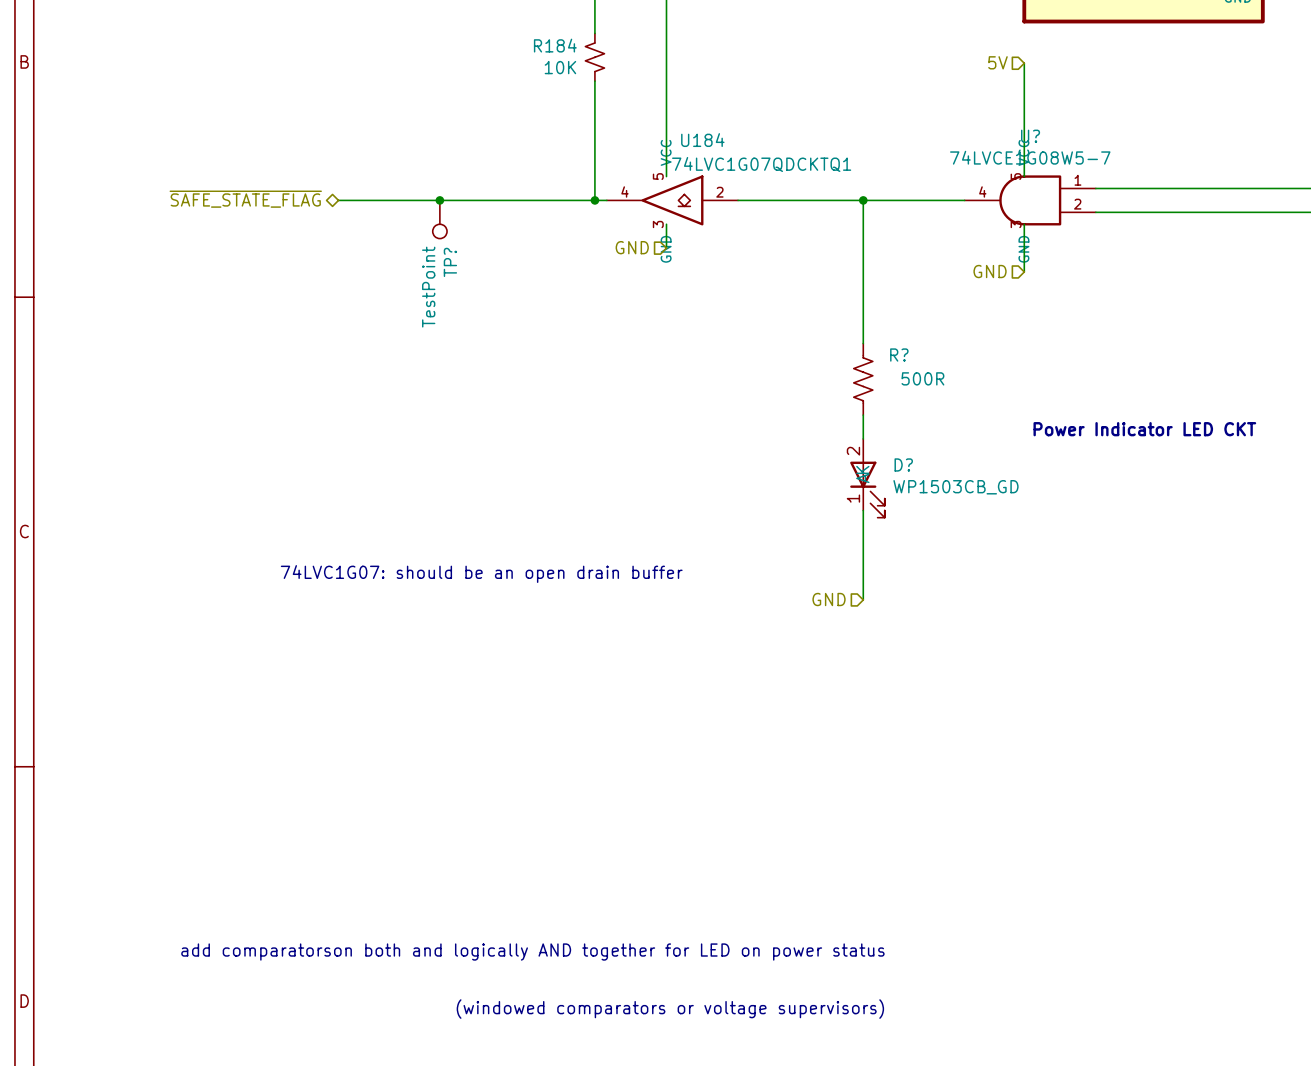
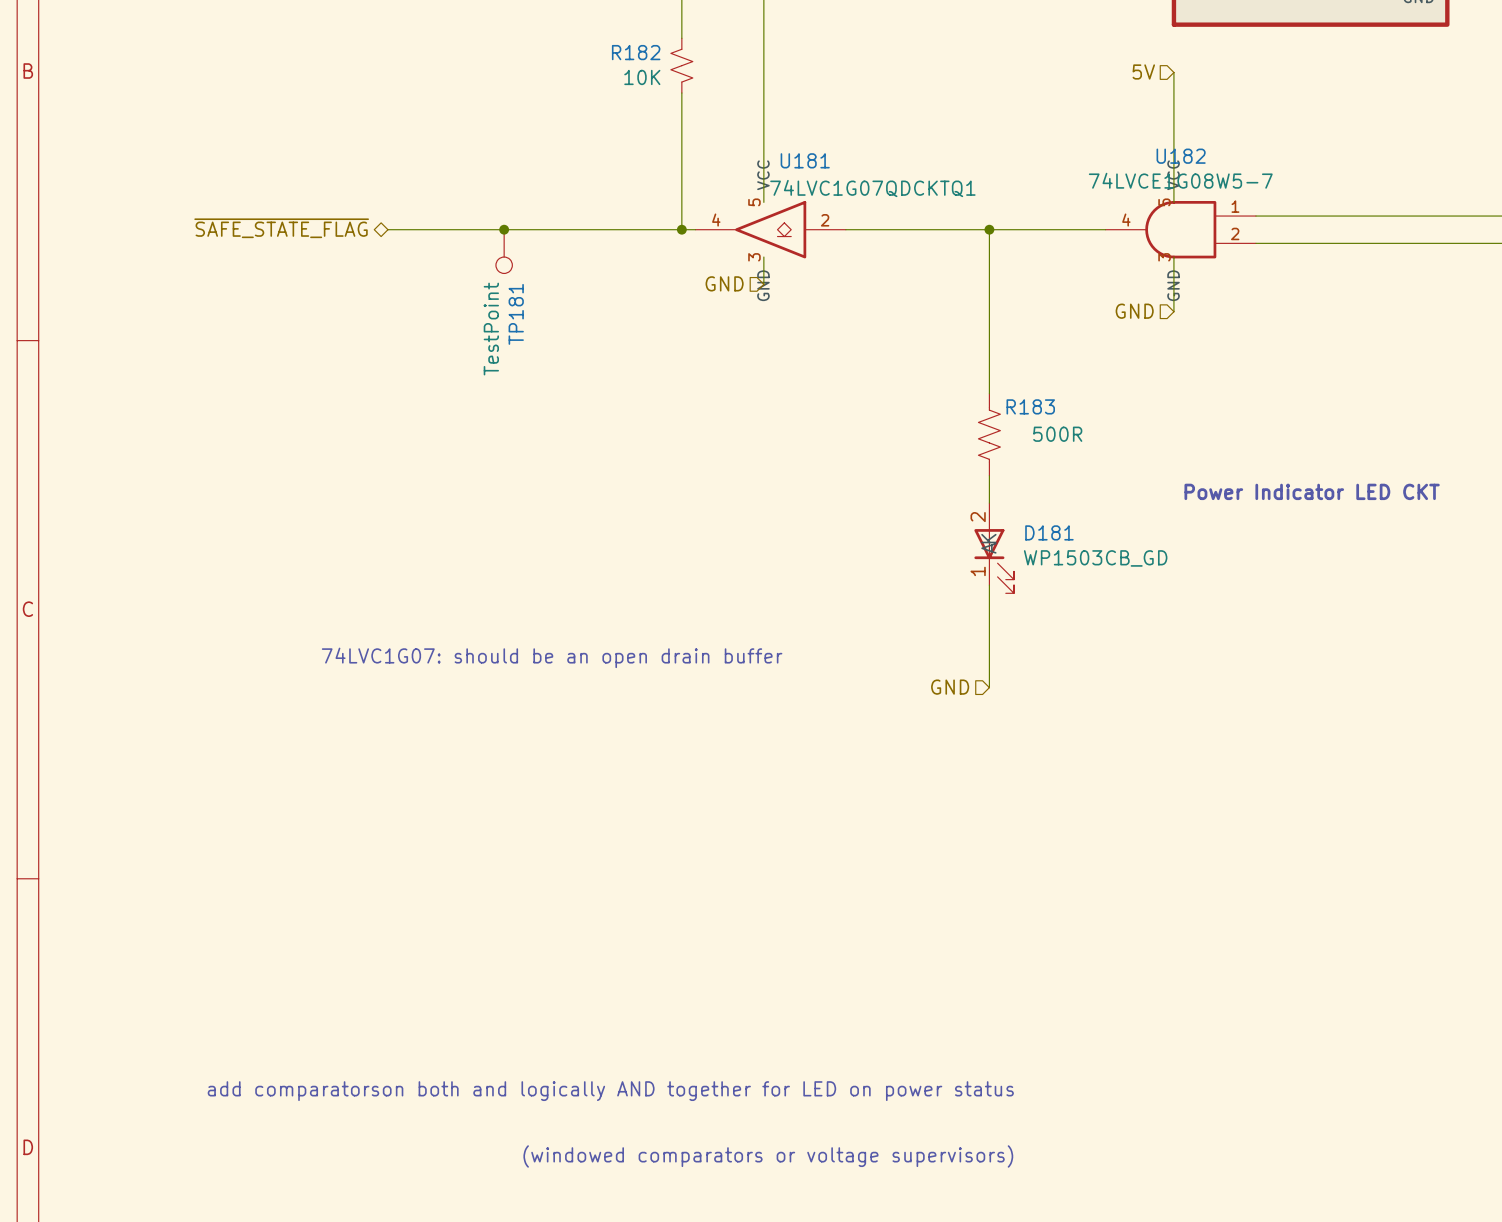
R184 name: R184 (555, 45) -> R182 (636, 52)
U? name: U? (1030, 136) -> U182 (1181, 156)
U184 name: U184 (702, 140) -> U181 (805, 160)
TP? name: TP? (450, 262) -> TP181 (516, 314)
R? name: R? (899, 355) -> R183 (1030, 406)
D? name: D? (903, 464) -> D181 (1049, 532)

